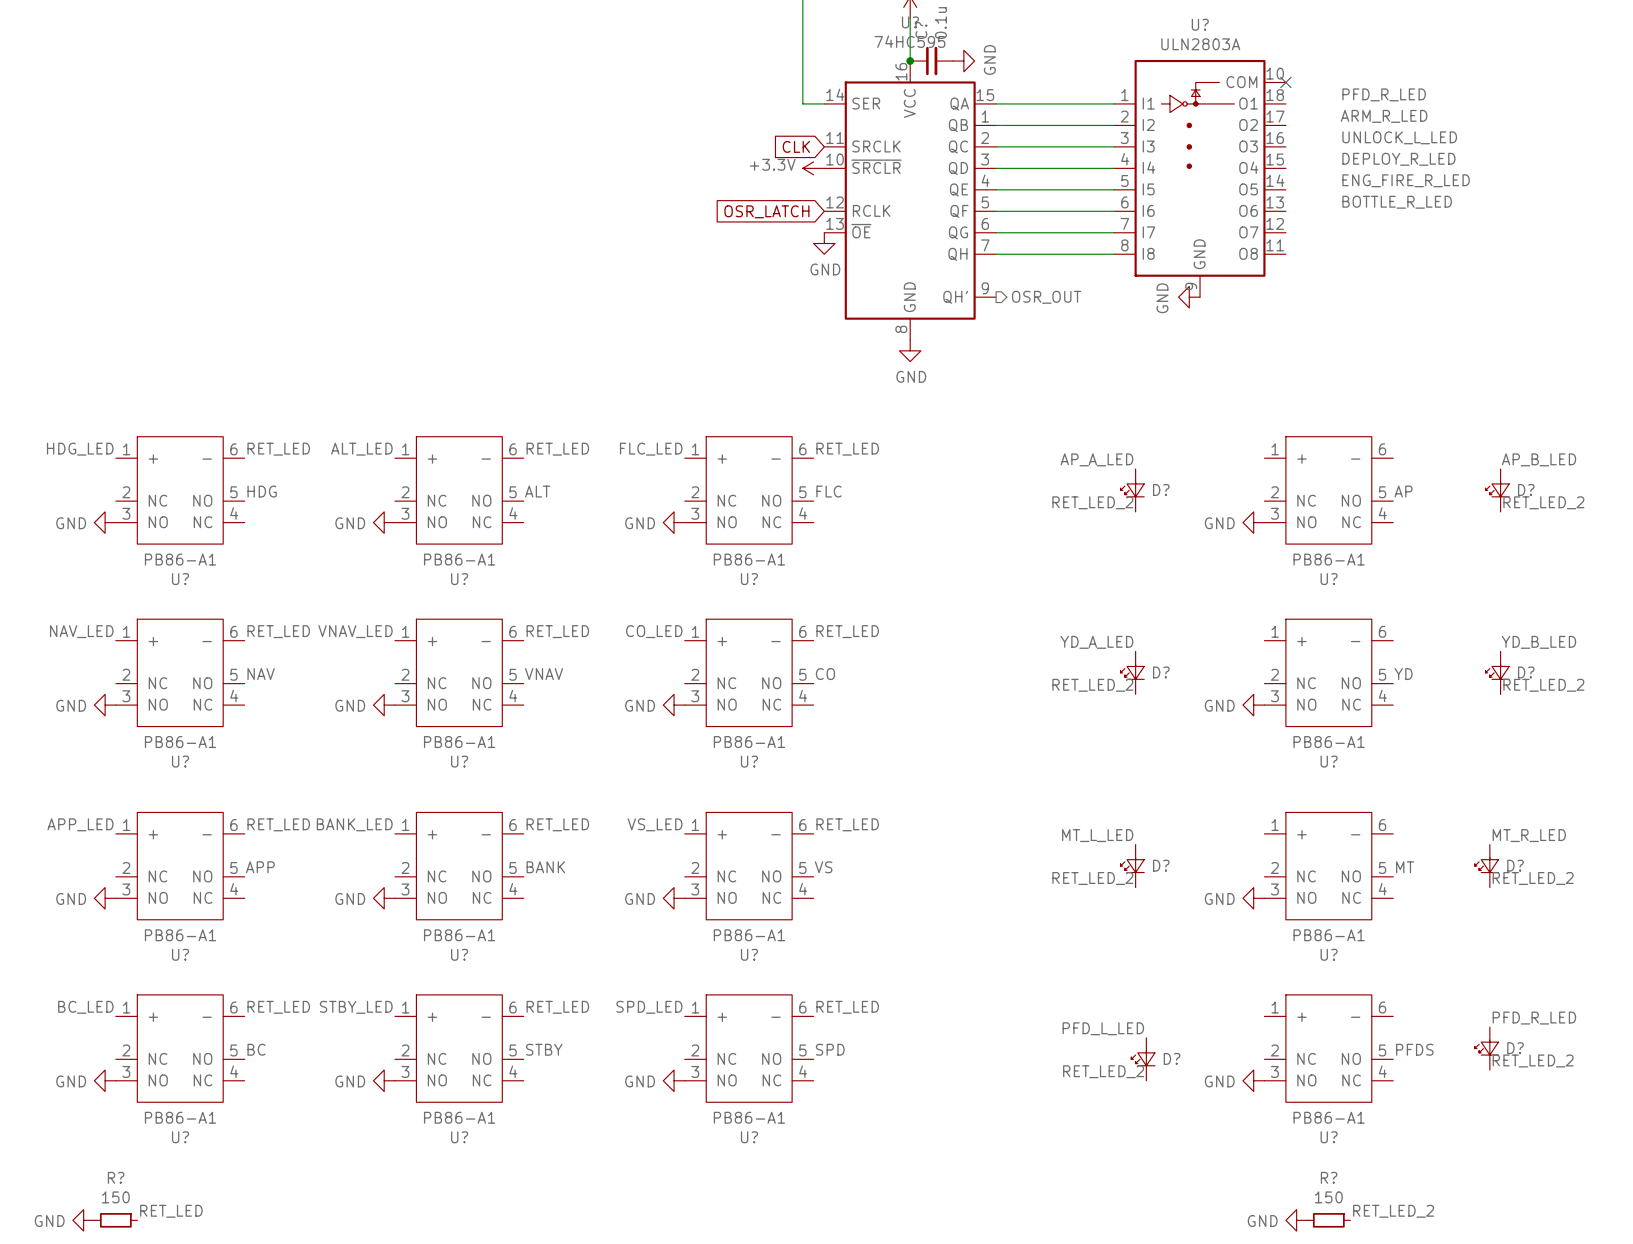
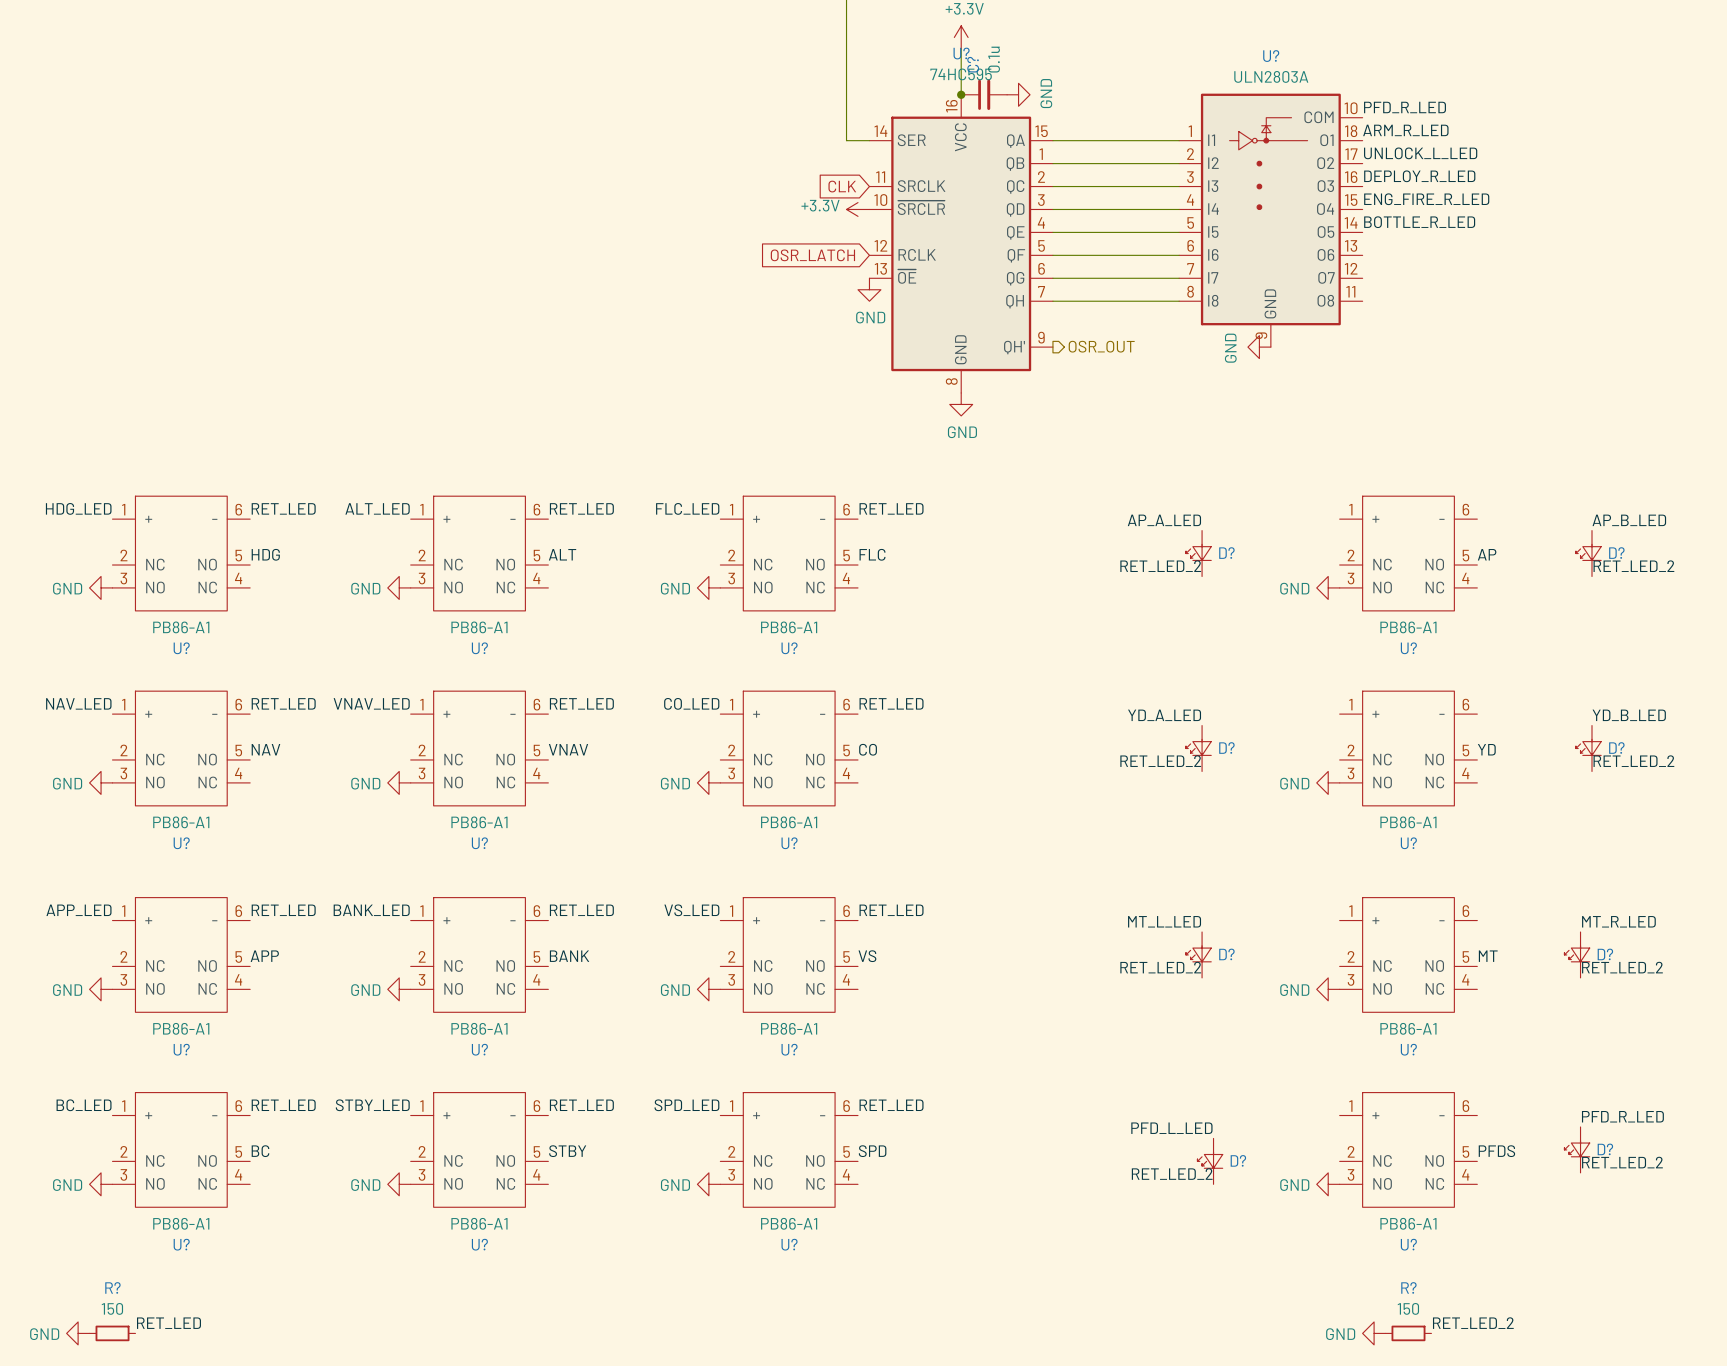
no-connect mark: (1285, 82) -> none
label position: PFD_R_LED (1384, 94) -> PFD_R_LED (1405, 107)
label position: ARM_R_LED (1384, 116) -> ARM_R_LED (1405, 130)
label position: UNLOCK_L_LED (1399, 137) -> UNLOCK_L_LED (1420, 153)
label position: DEPLOY_R_LED (1398, 159) -> DEPLOY_R_LED (1419, 176)
label position: ENG_FIRE_R_LED (1406, 180) -> ENG_FIRE_R_LED (1426, 199)
label position: BOTTLE_R_LED (1397, 202) -> BOTTLE_R_LED (1419, 222)

